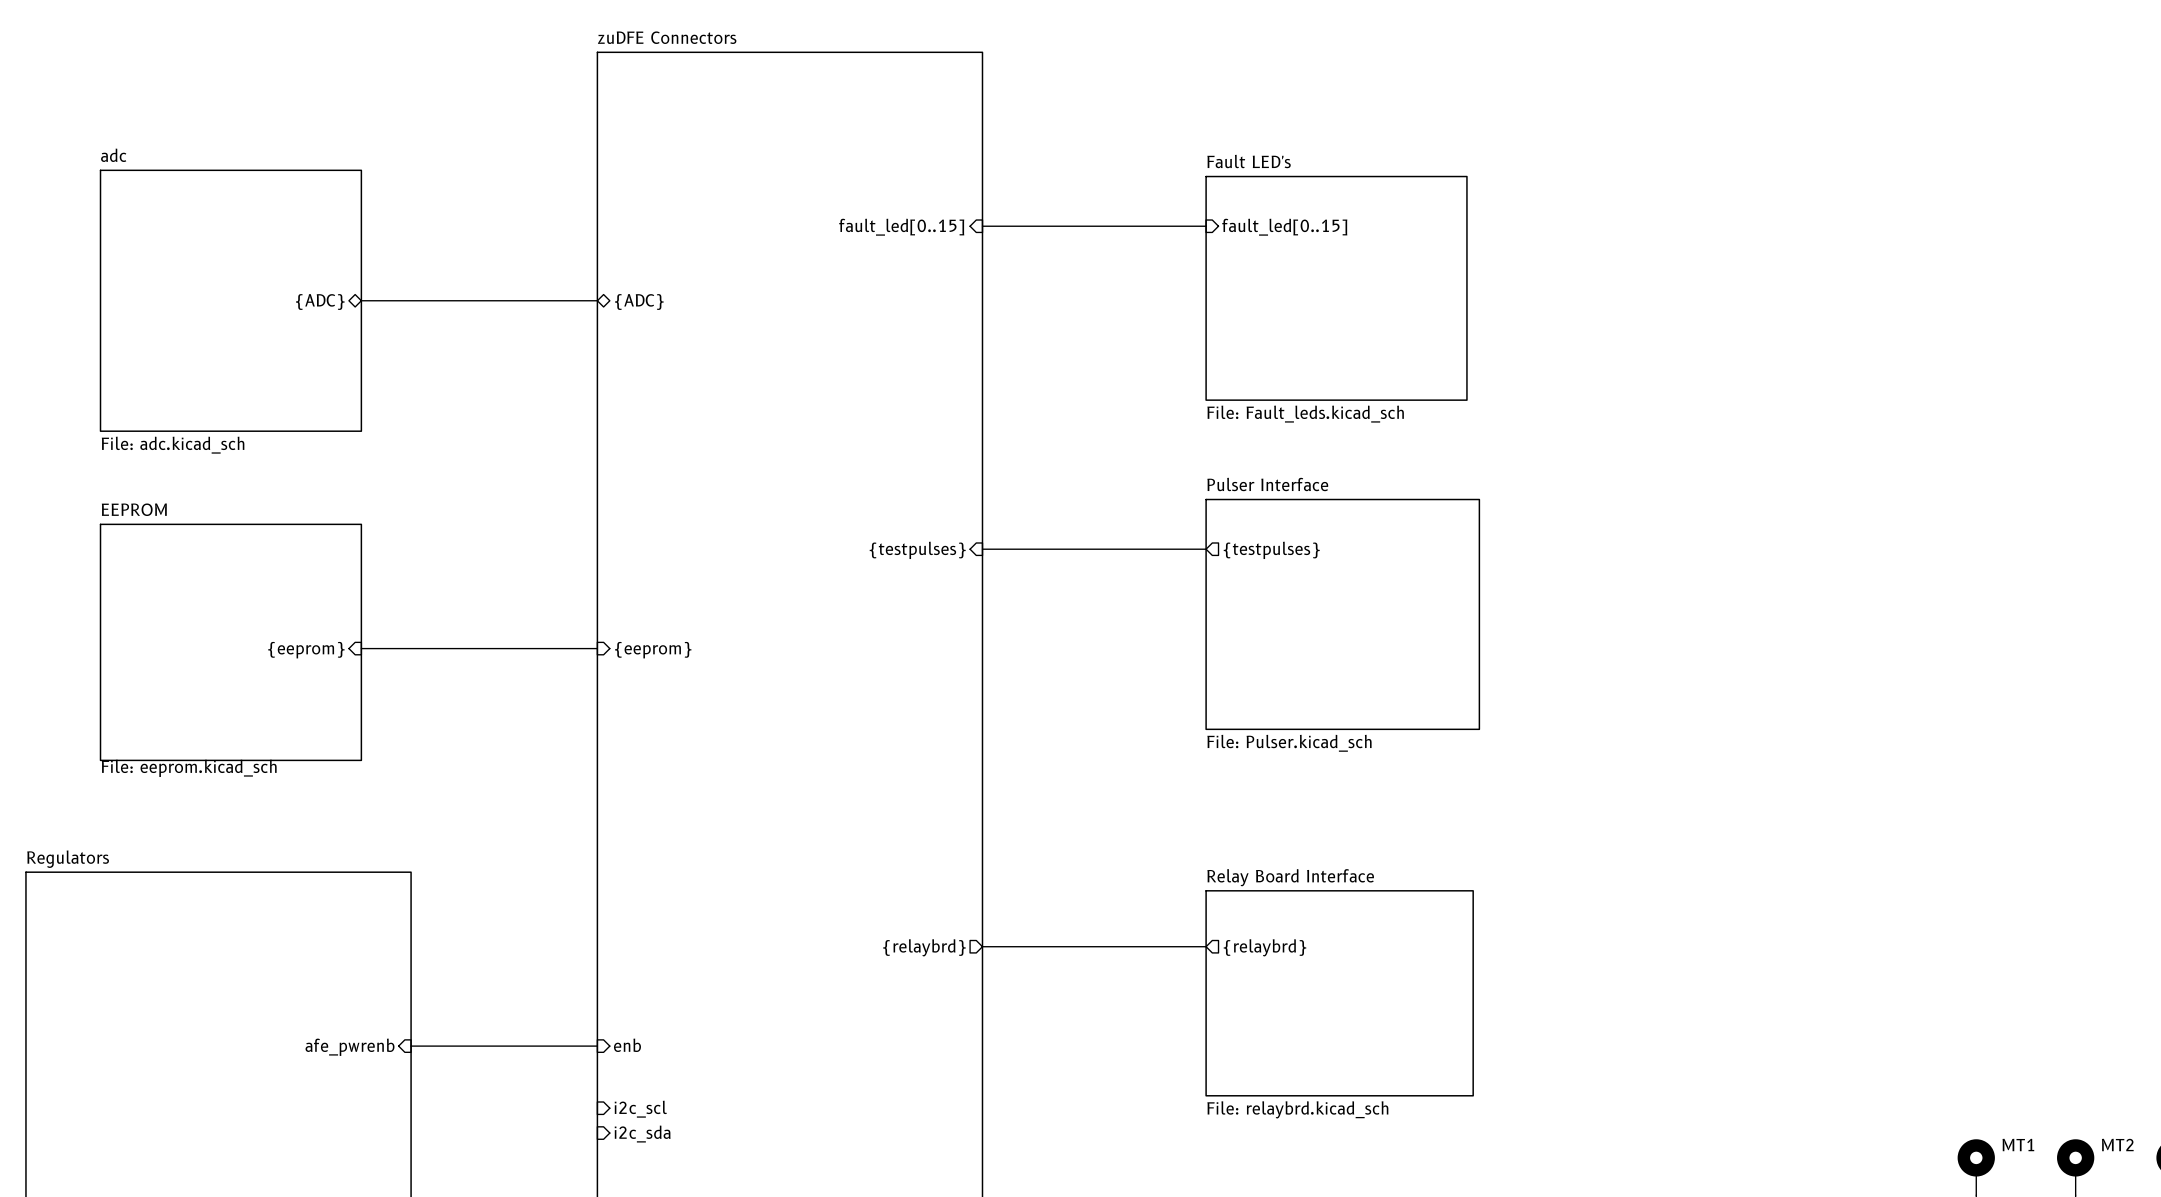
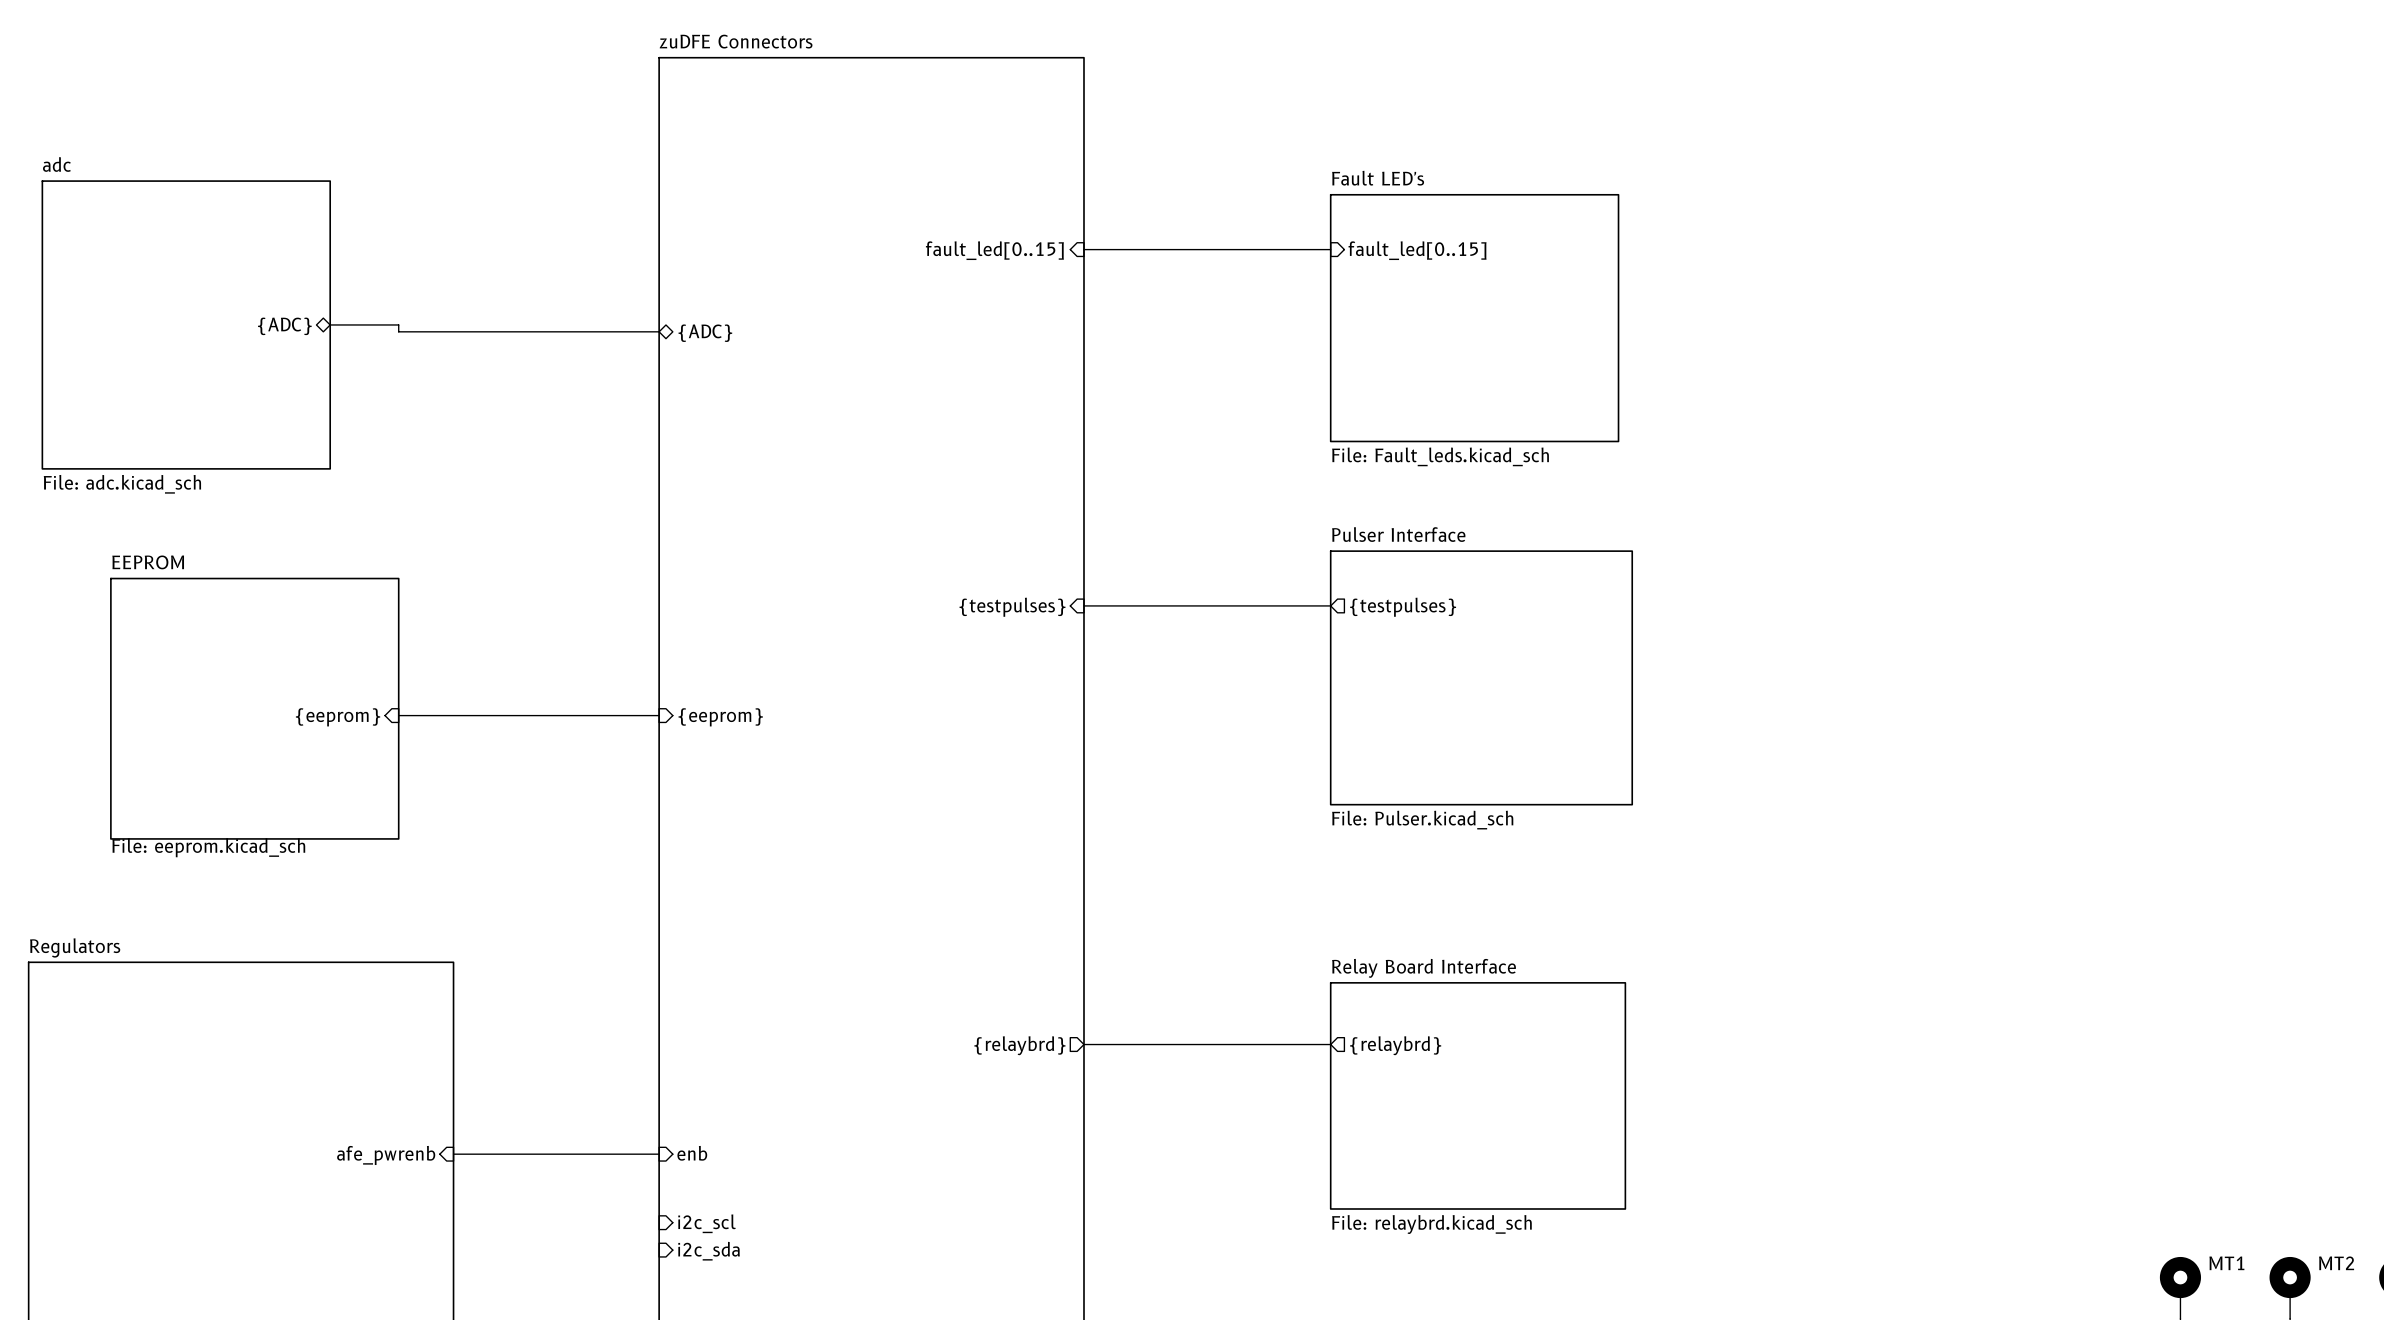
bus: none -> (330, 324) (398, 324) (398, 331)
sheet adc position: (230, 300) -> (186, 324)
sheet pin position: {ADC} (320, 302) -> {ADC} (284, 326)

